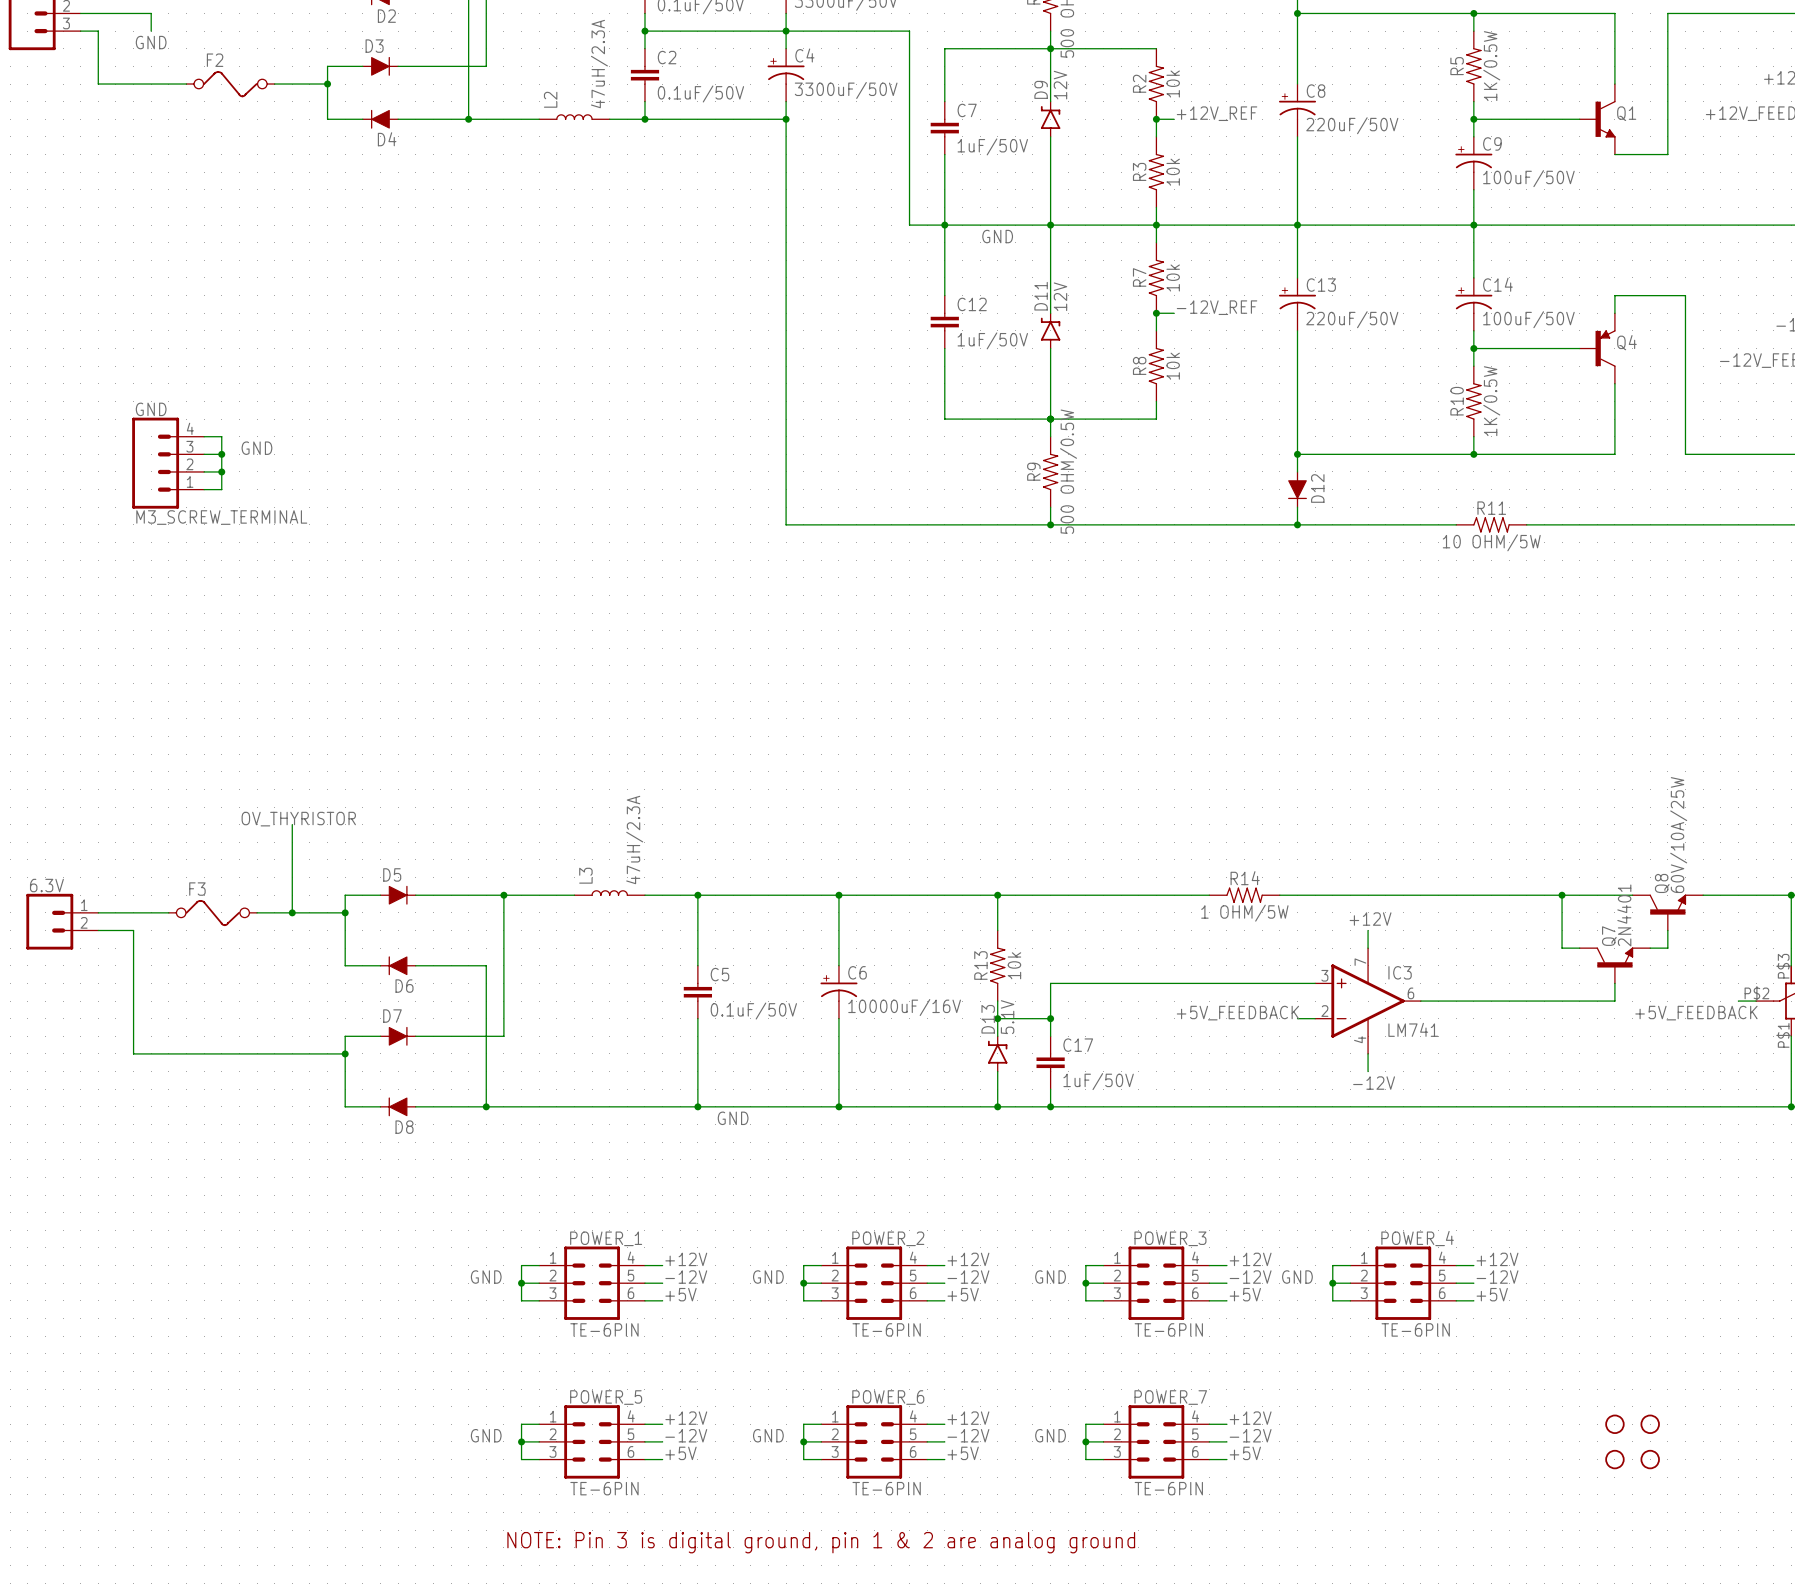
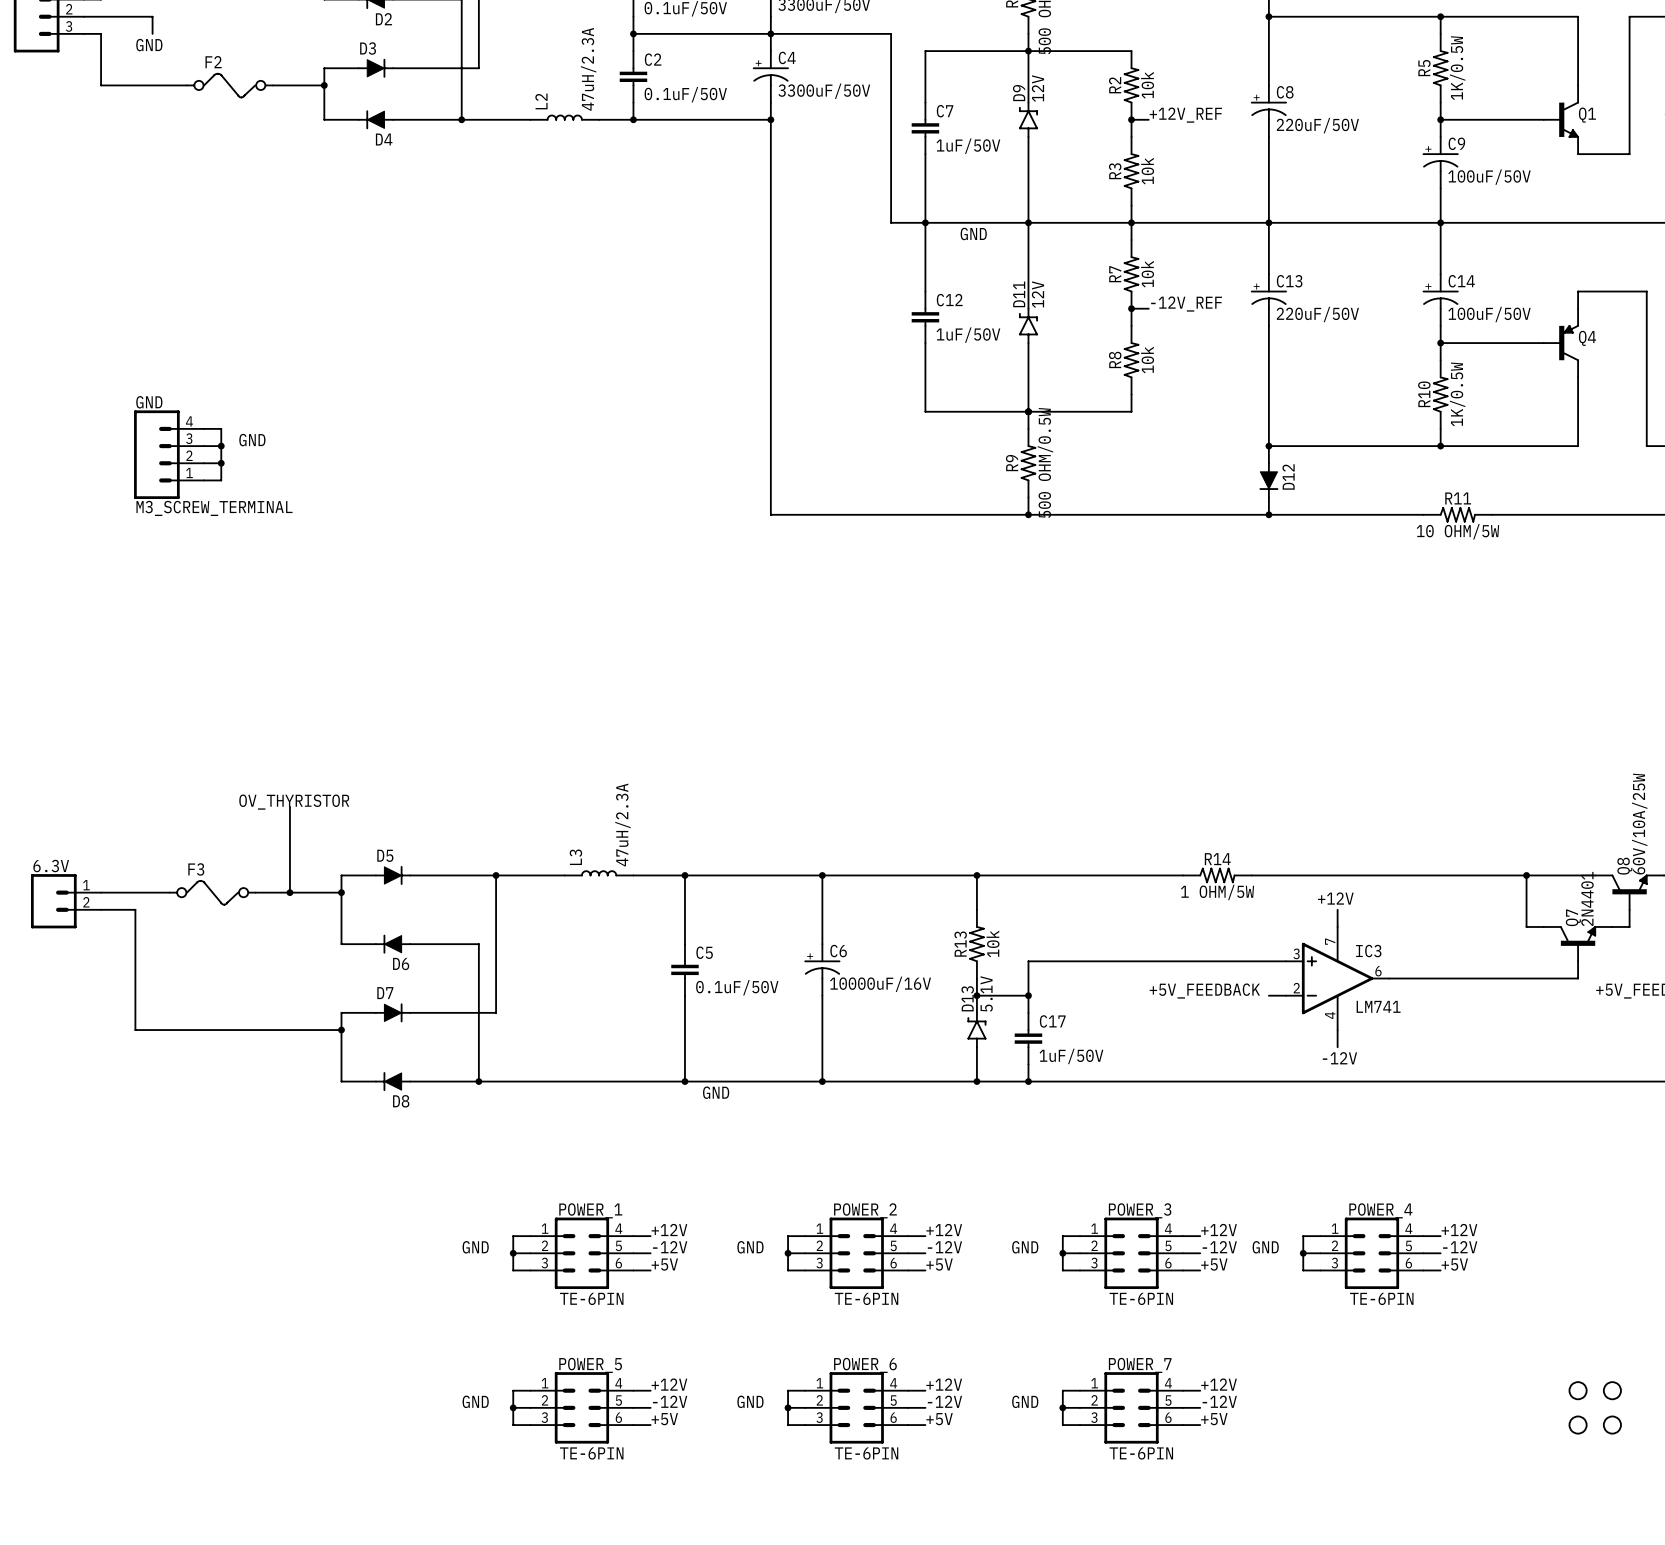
text: NOTE: Pin 3 is digital ground, pin 1 & 2 are analog ground (821, 1542) -> none

